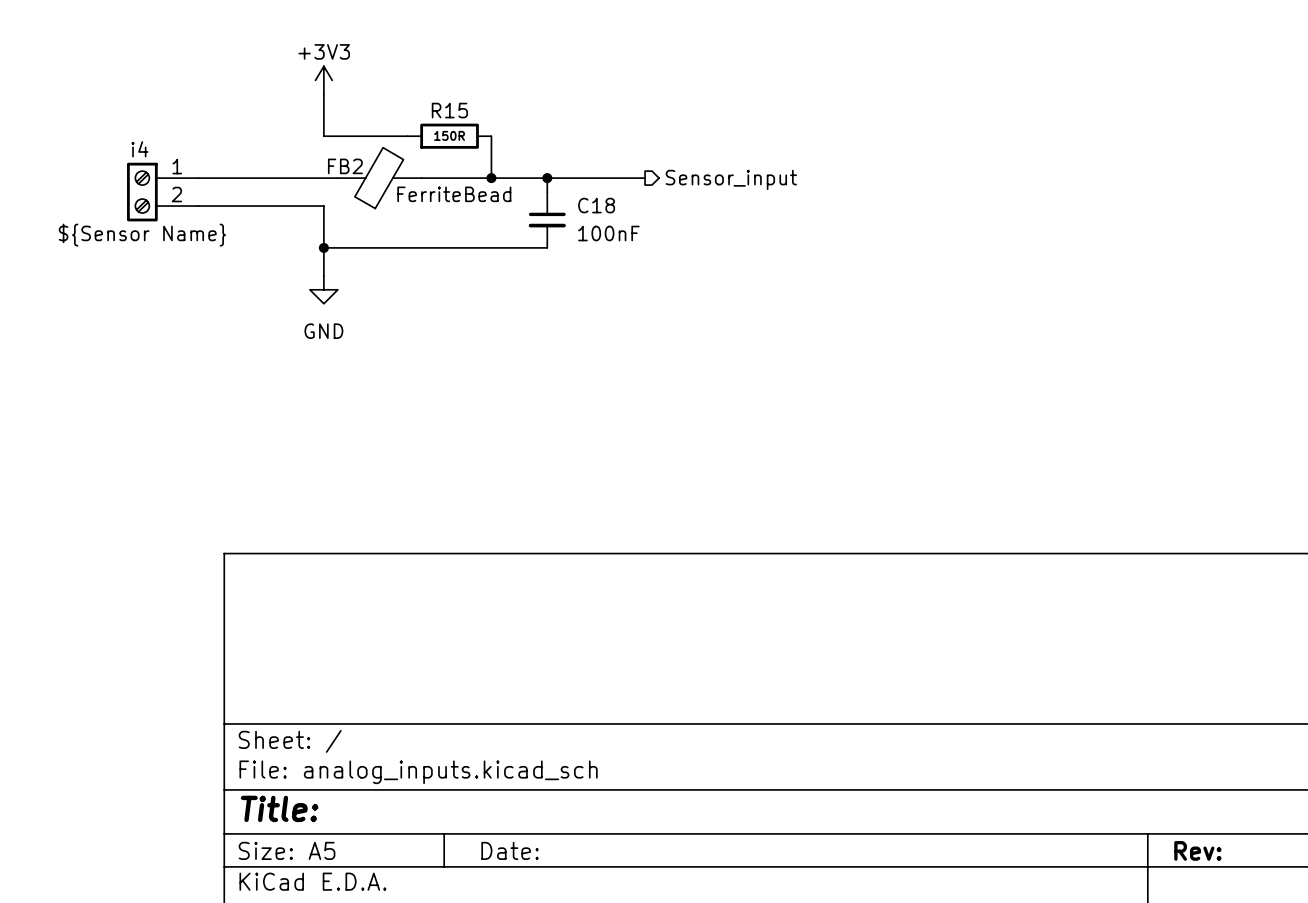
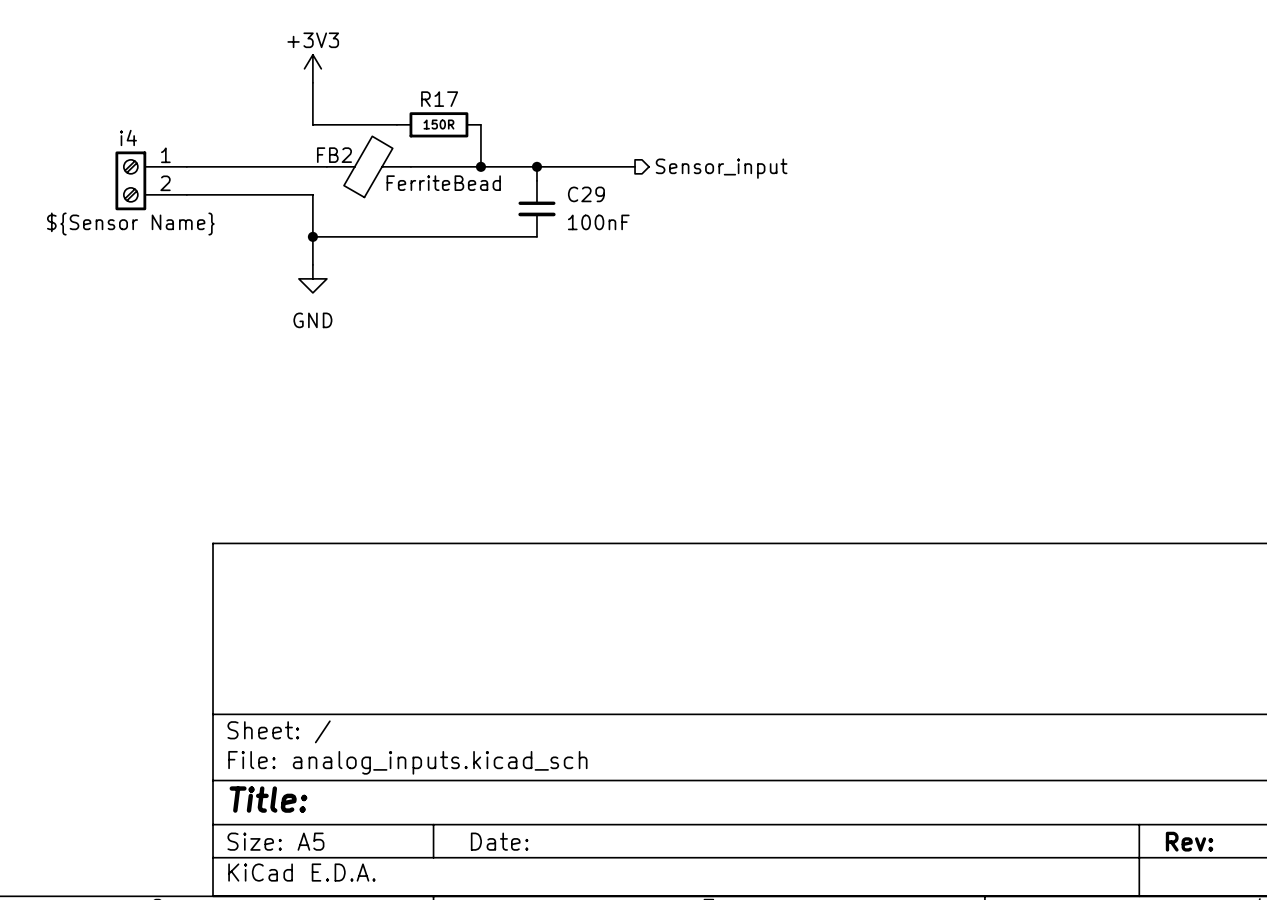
R15 name: R15 (449, 110) -> R17 (439, 99)
C18 name: C18 (596, 205) -> C29 (586, 194)

